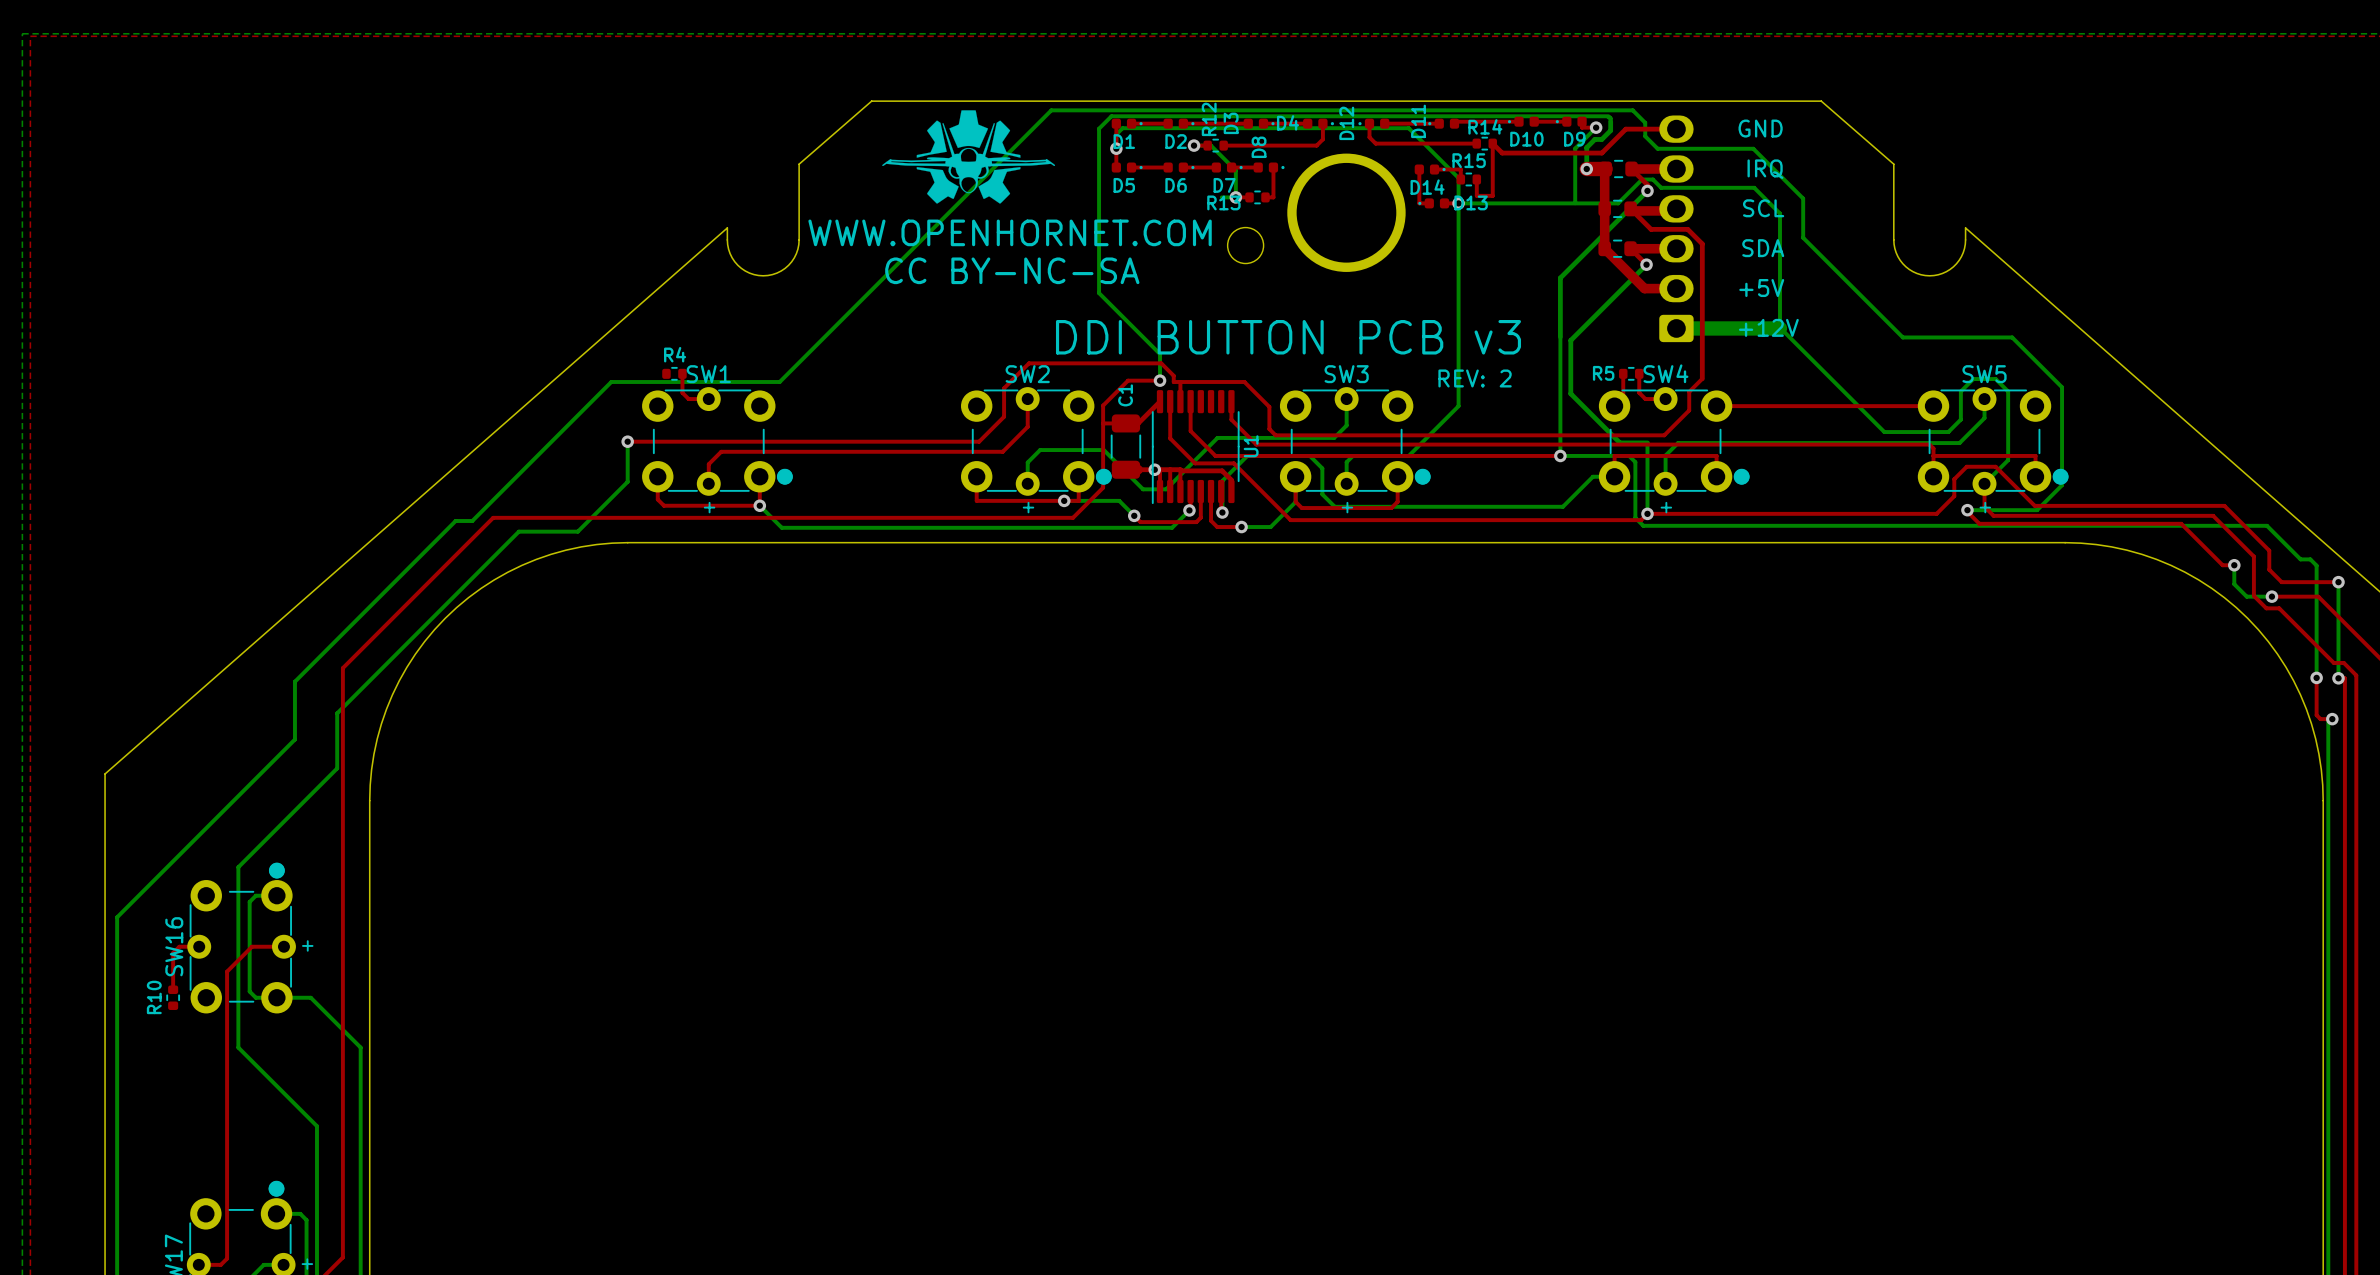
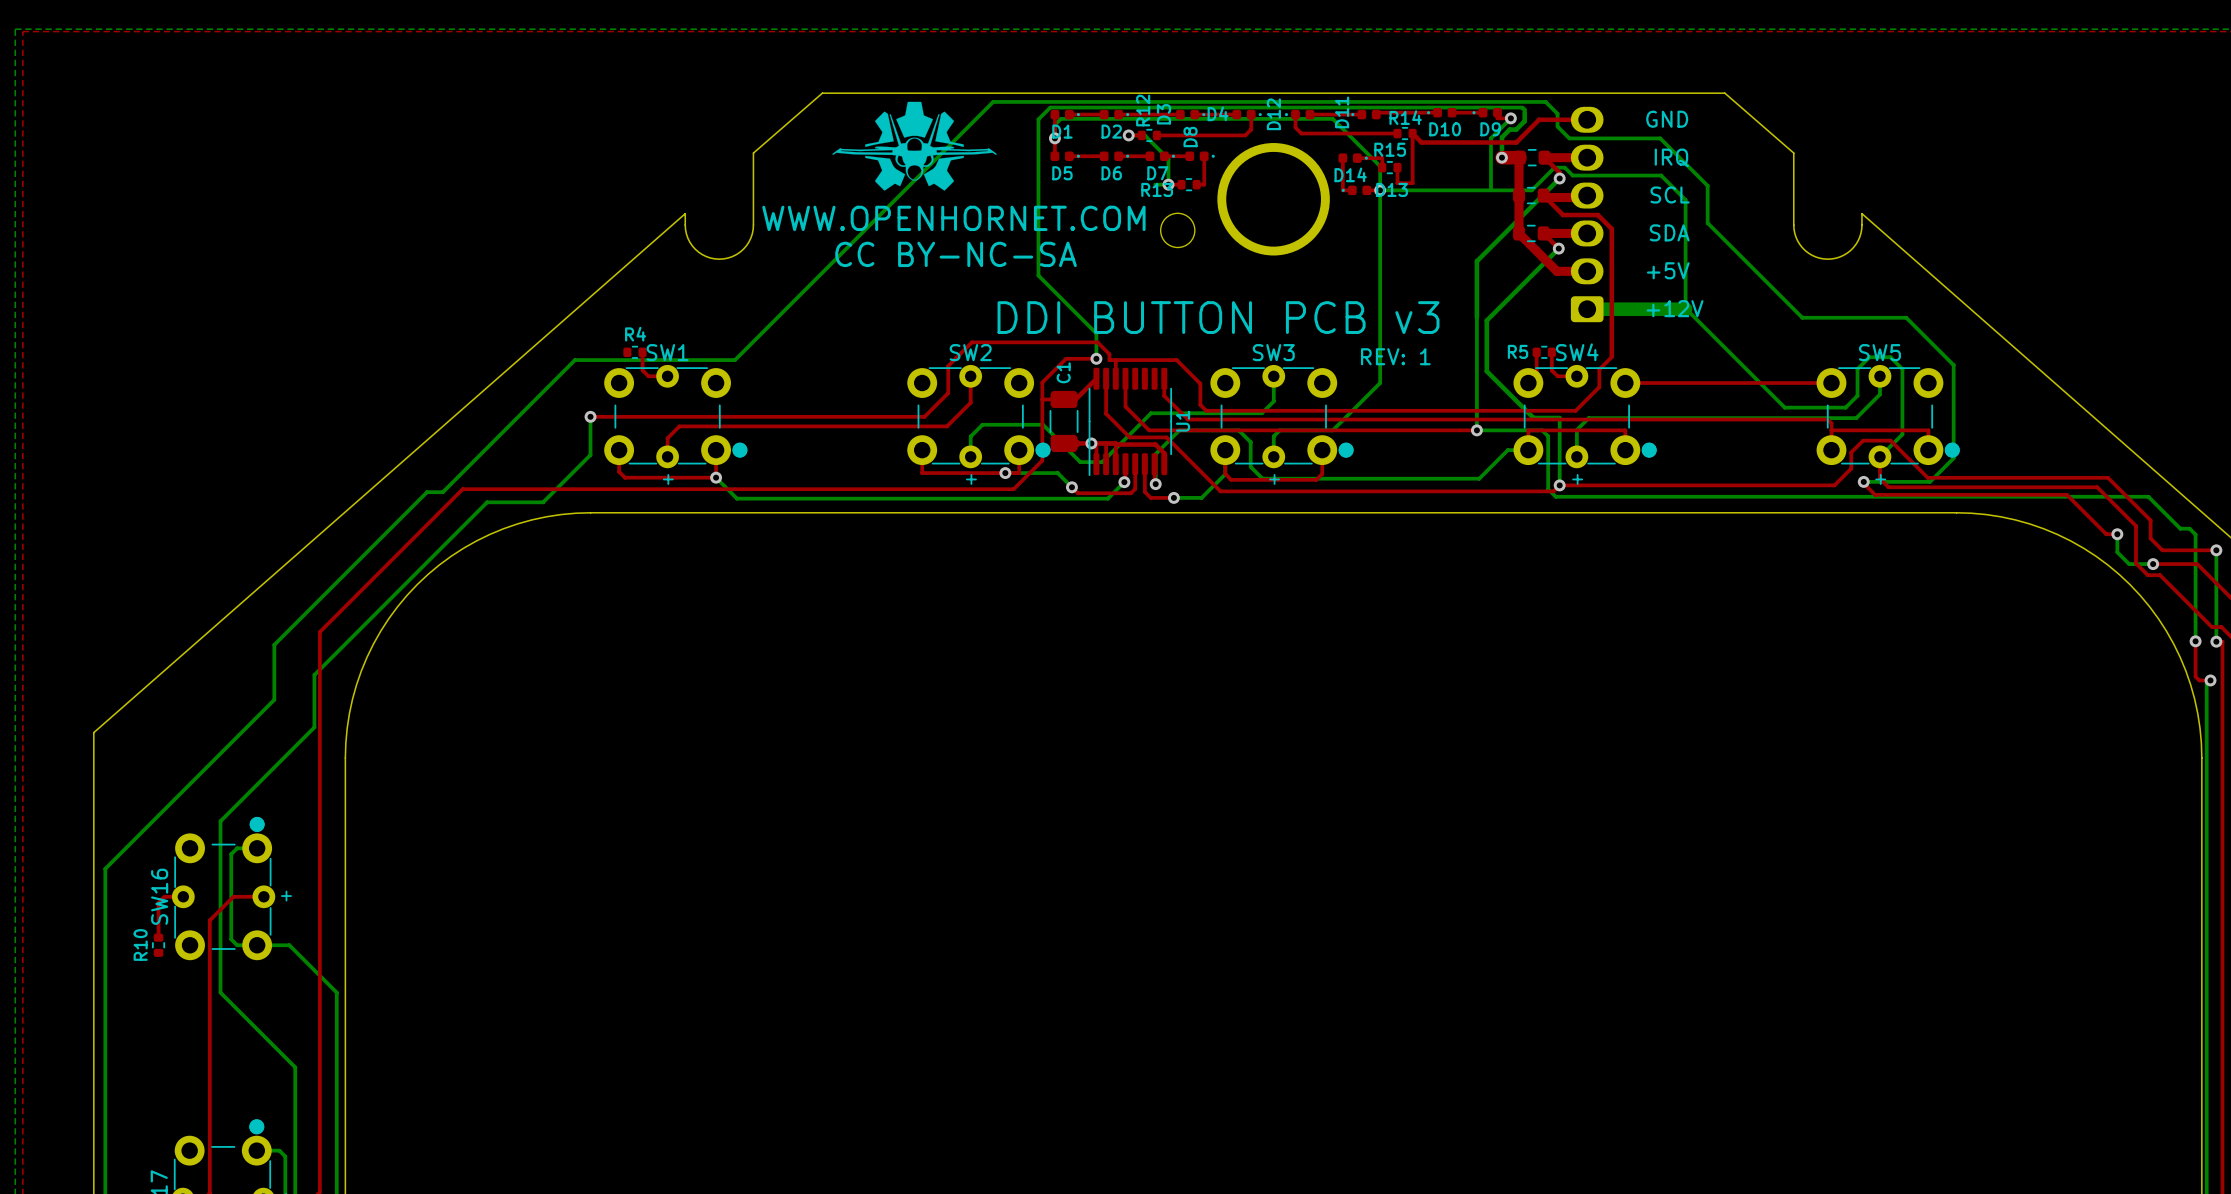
text: REV: 2 (1475, 378) -> REV: 1 (1395, 356)

